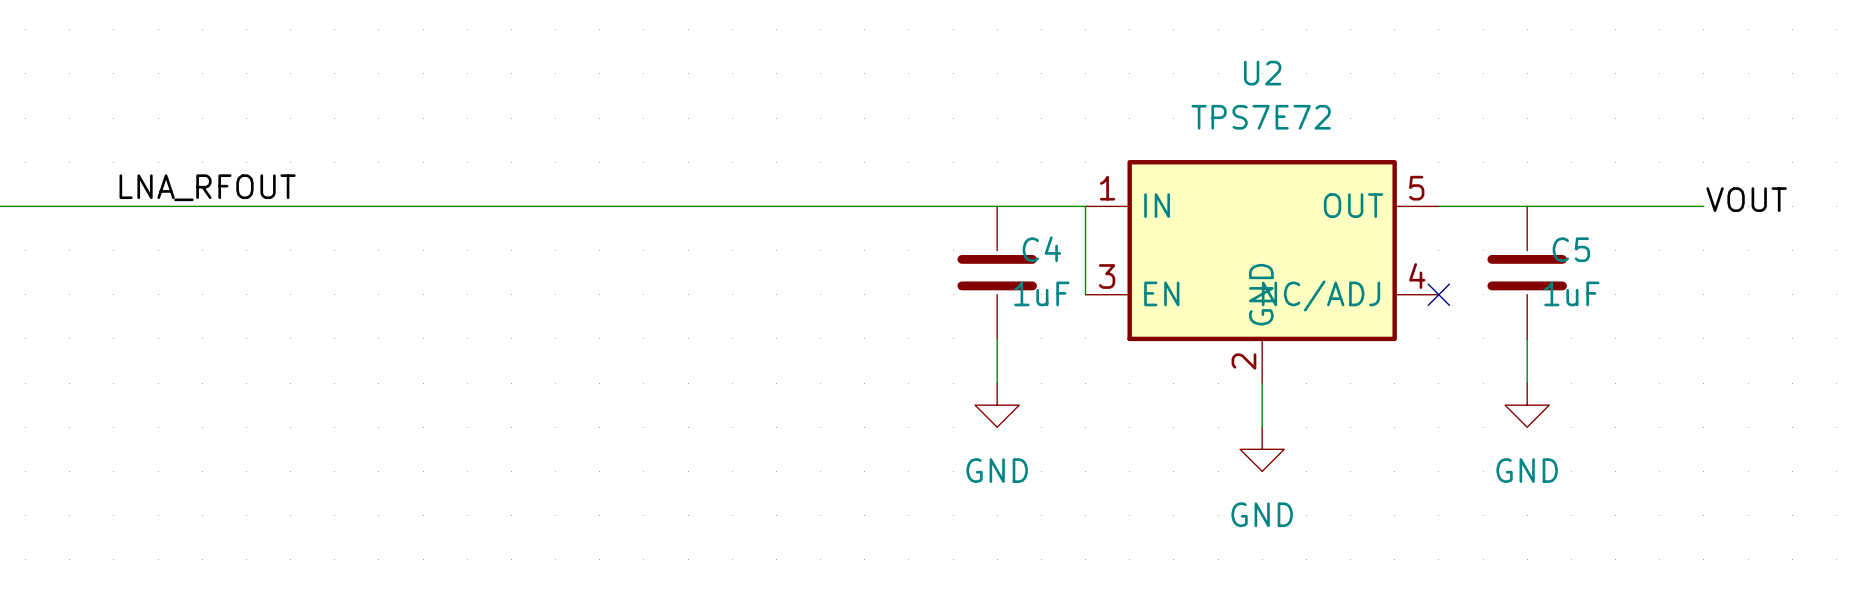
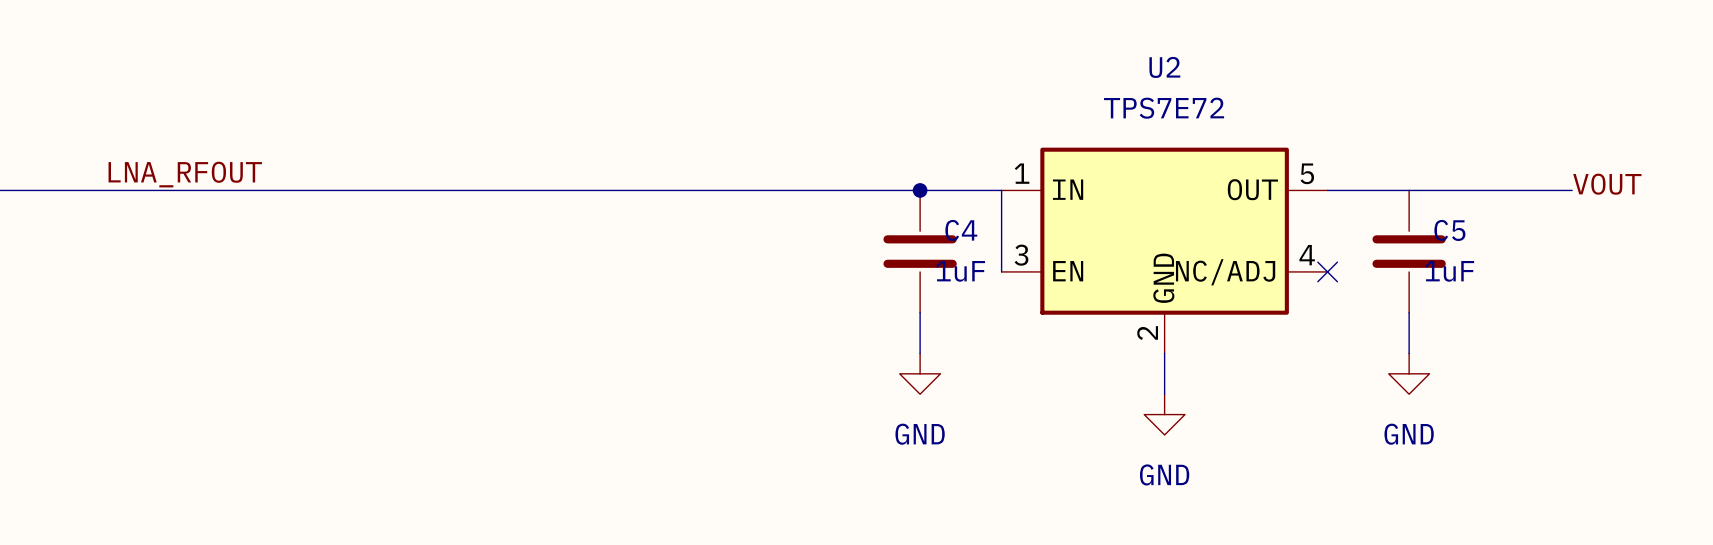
junction: none -> (920, 190)

